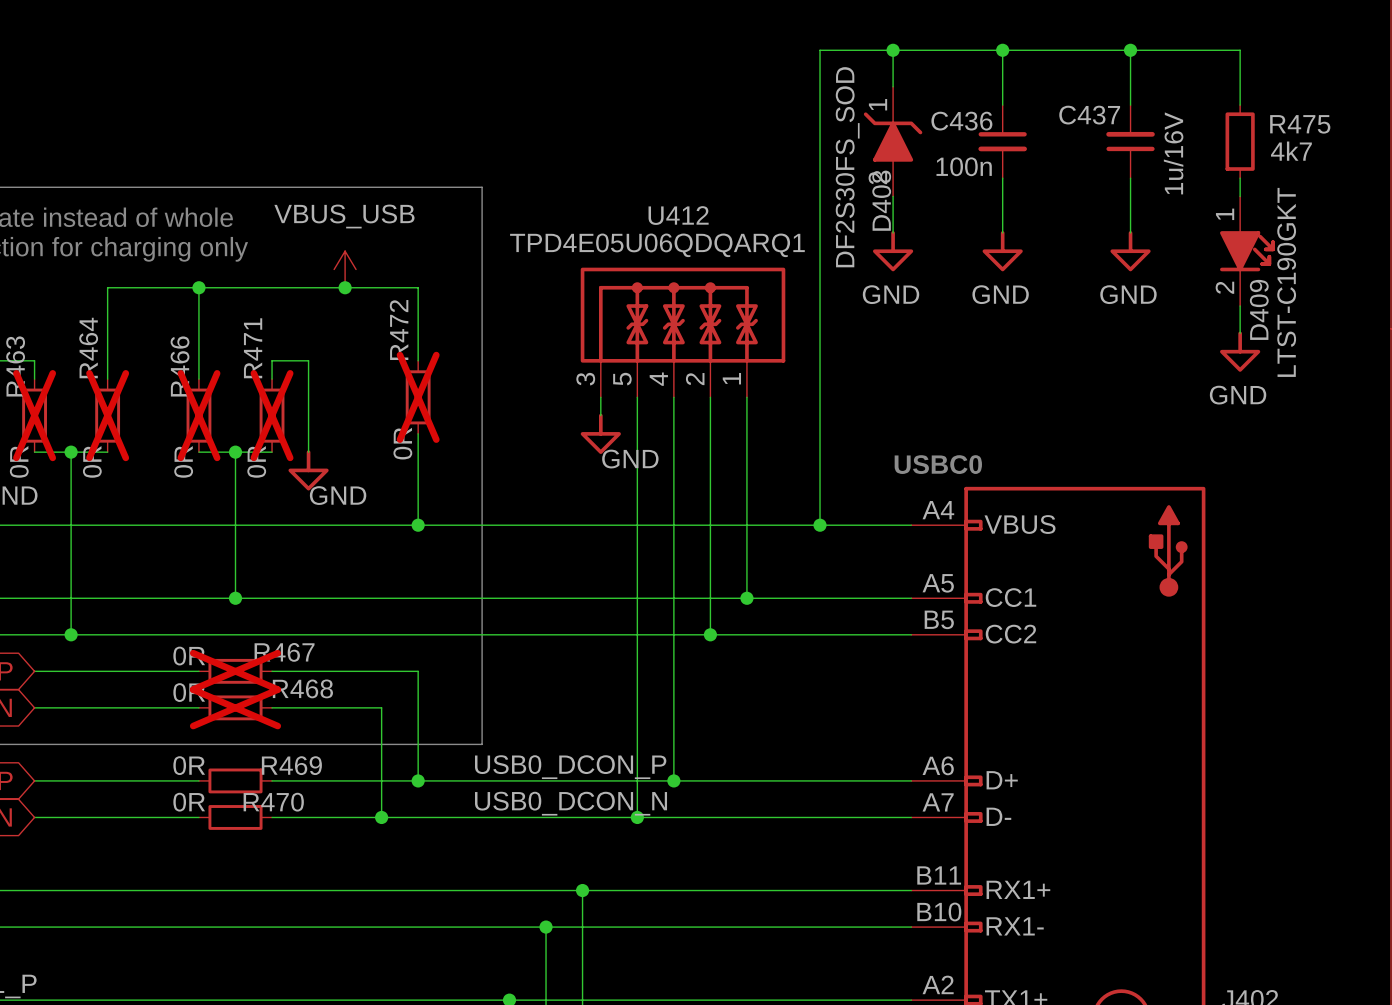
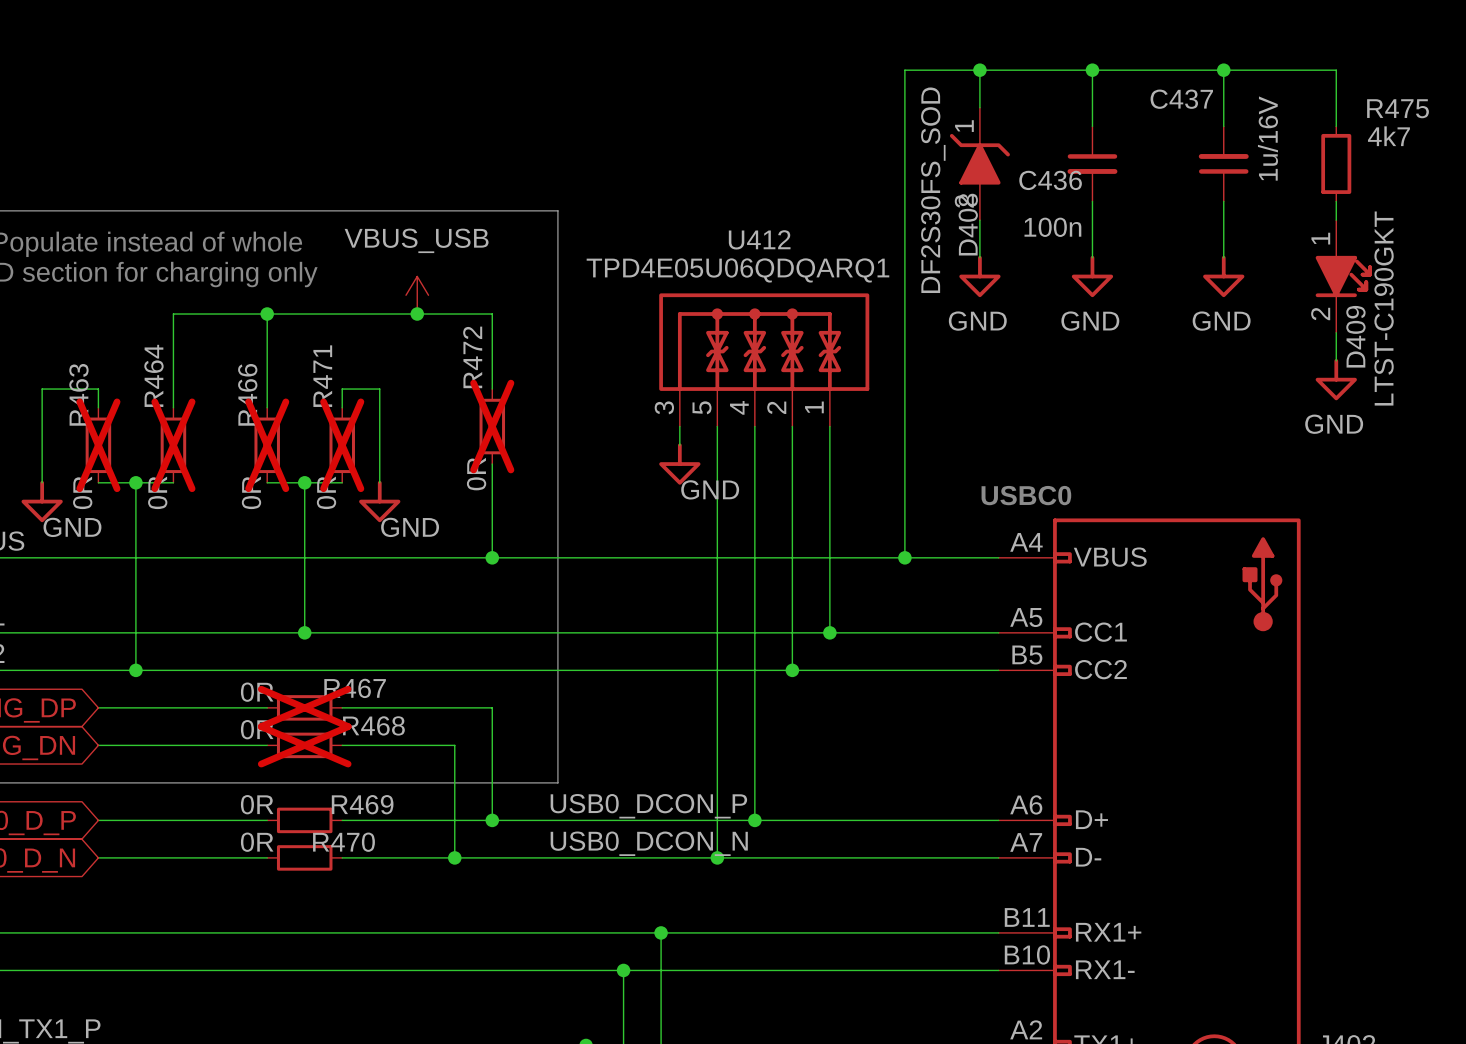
C437 name position: C437 (1089, 115) -> C437 (1181, 99)
C436 name position: C436 (961, 121) -> C436 (1050, 180)
R475 name position: R475 (1300, 124) -> R475 (1398, 108)
R475 text position: 4k7 (1291, 151) -> 4k7 (1388, 136)
C437 text position: 1u/16V (1173, 153) -> 1u/16V (1267, 138)
C436 text position: 100n (964, 166) -> 100n (1052, 227)

